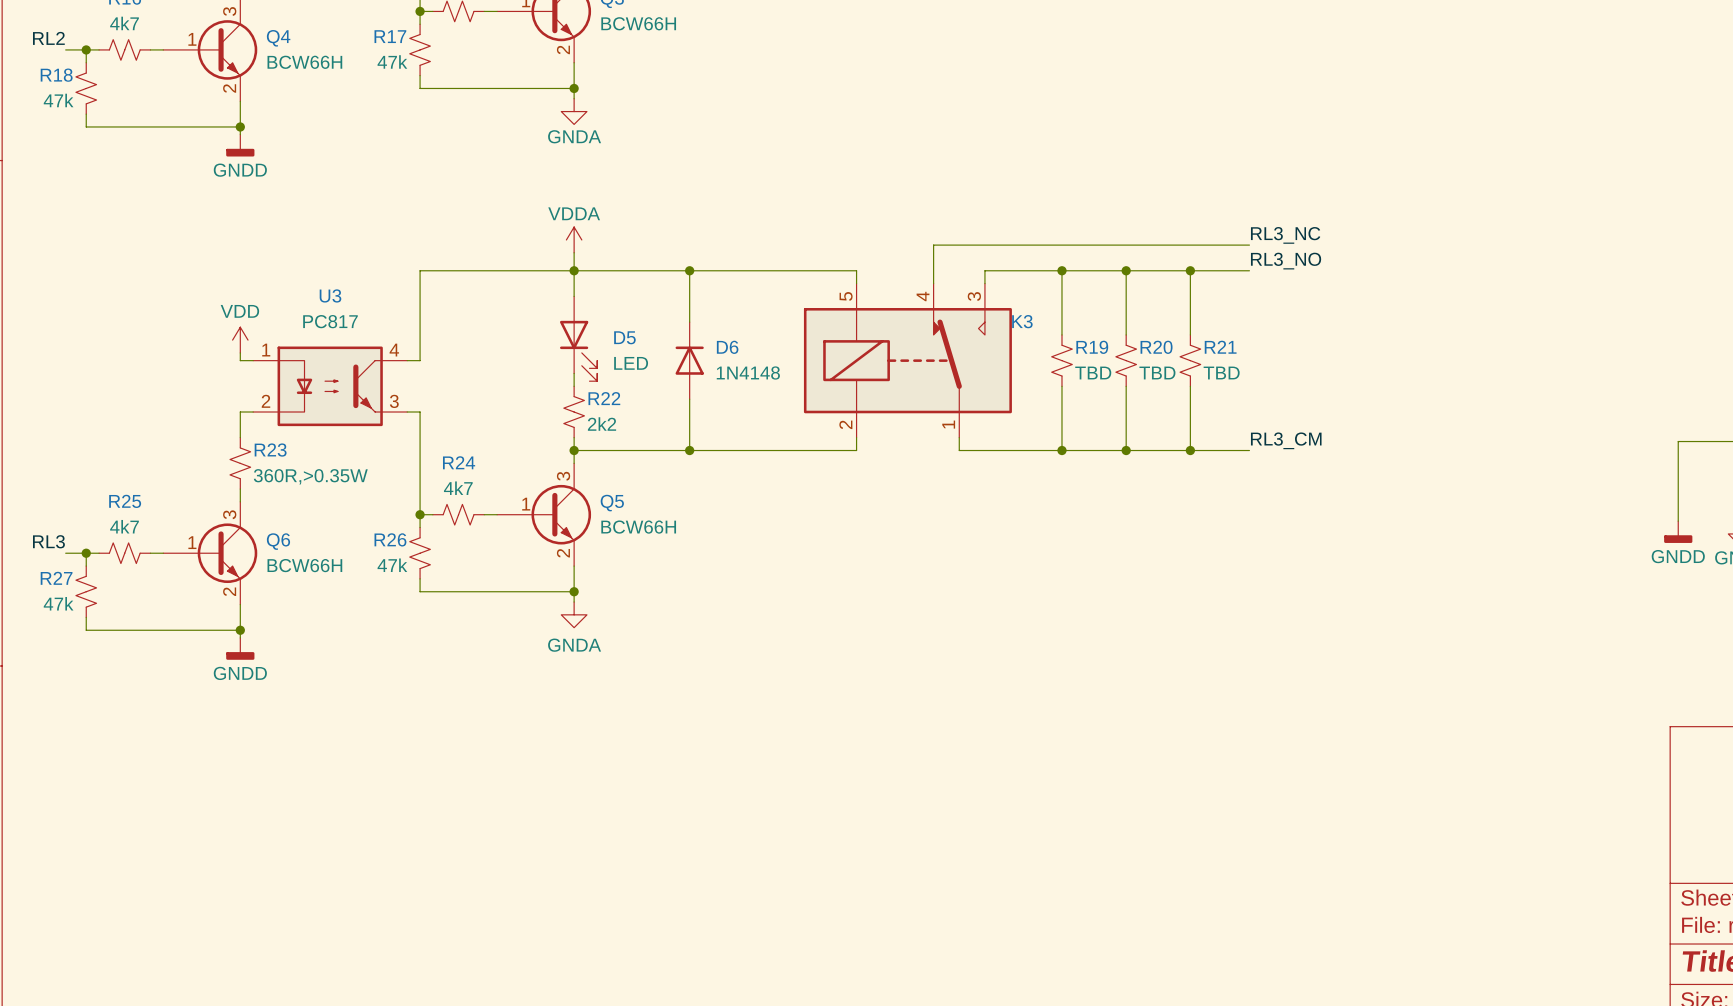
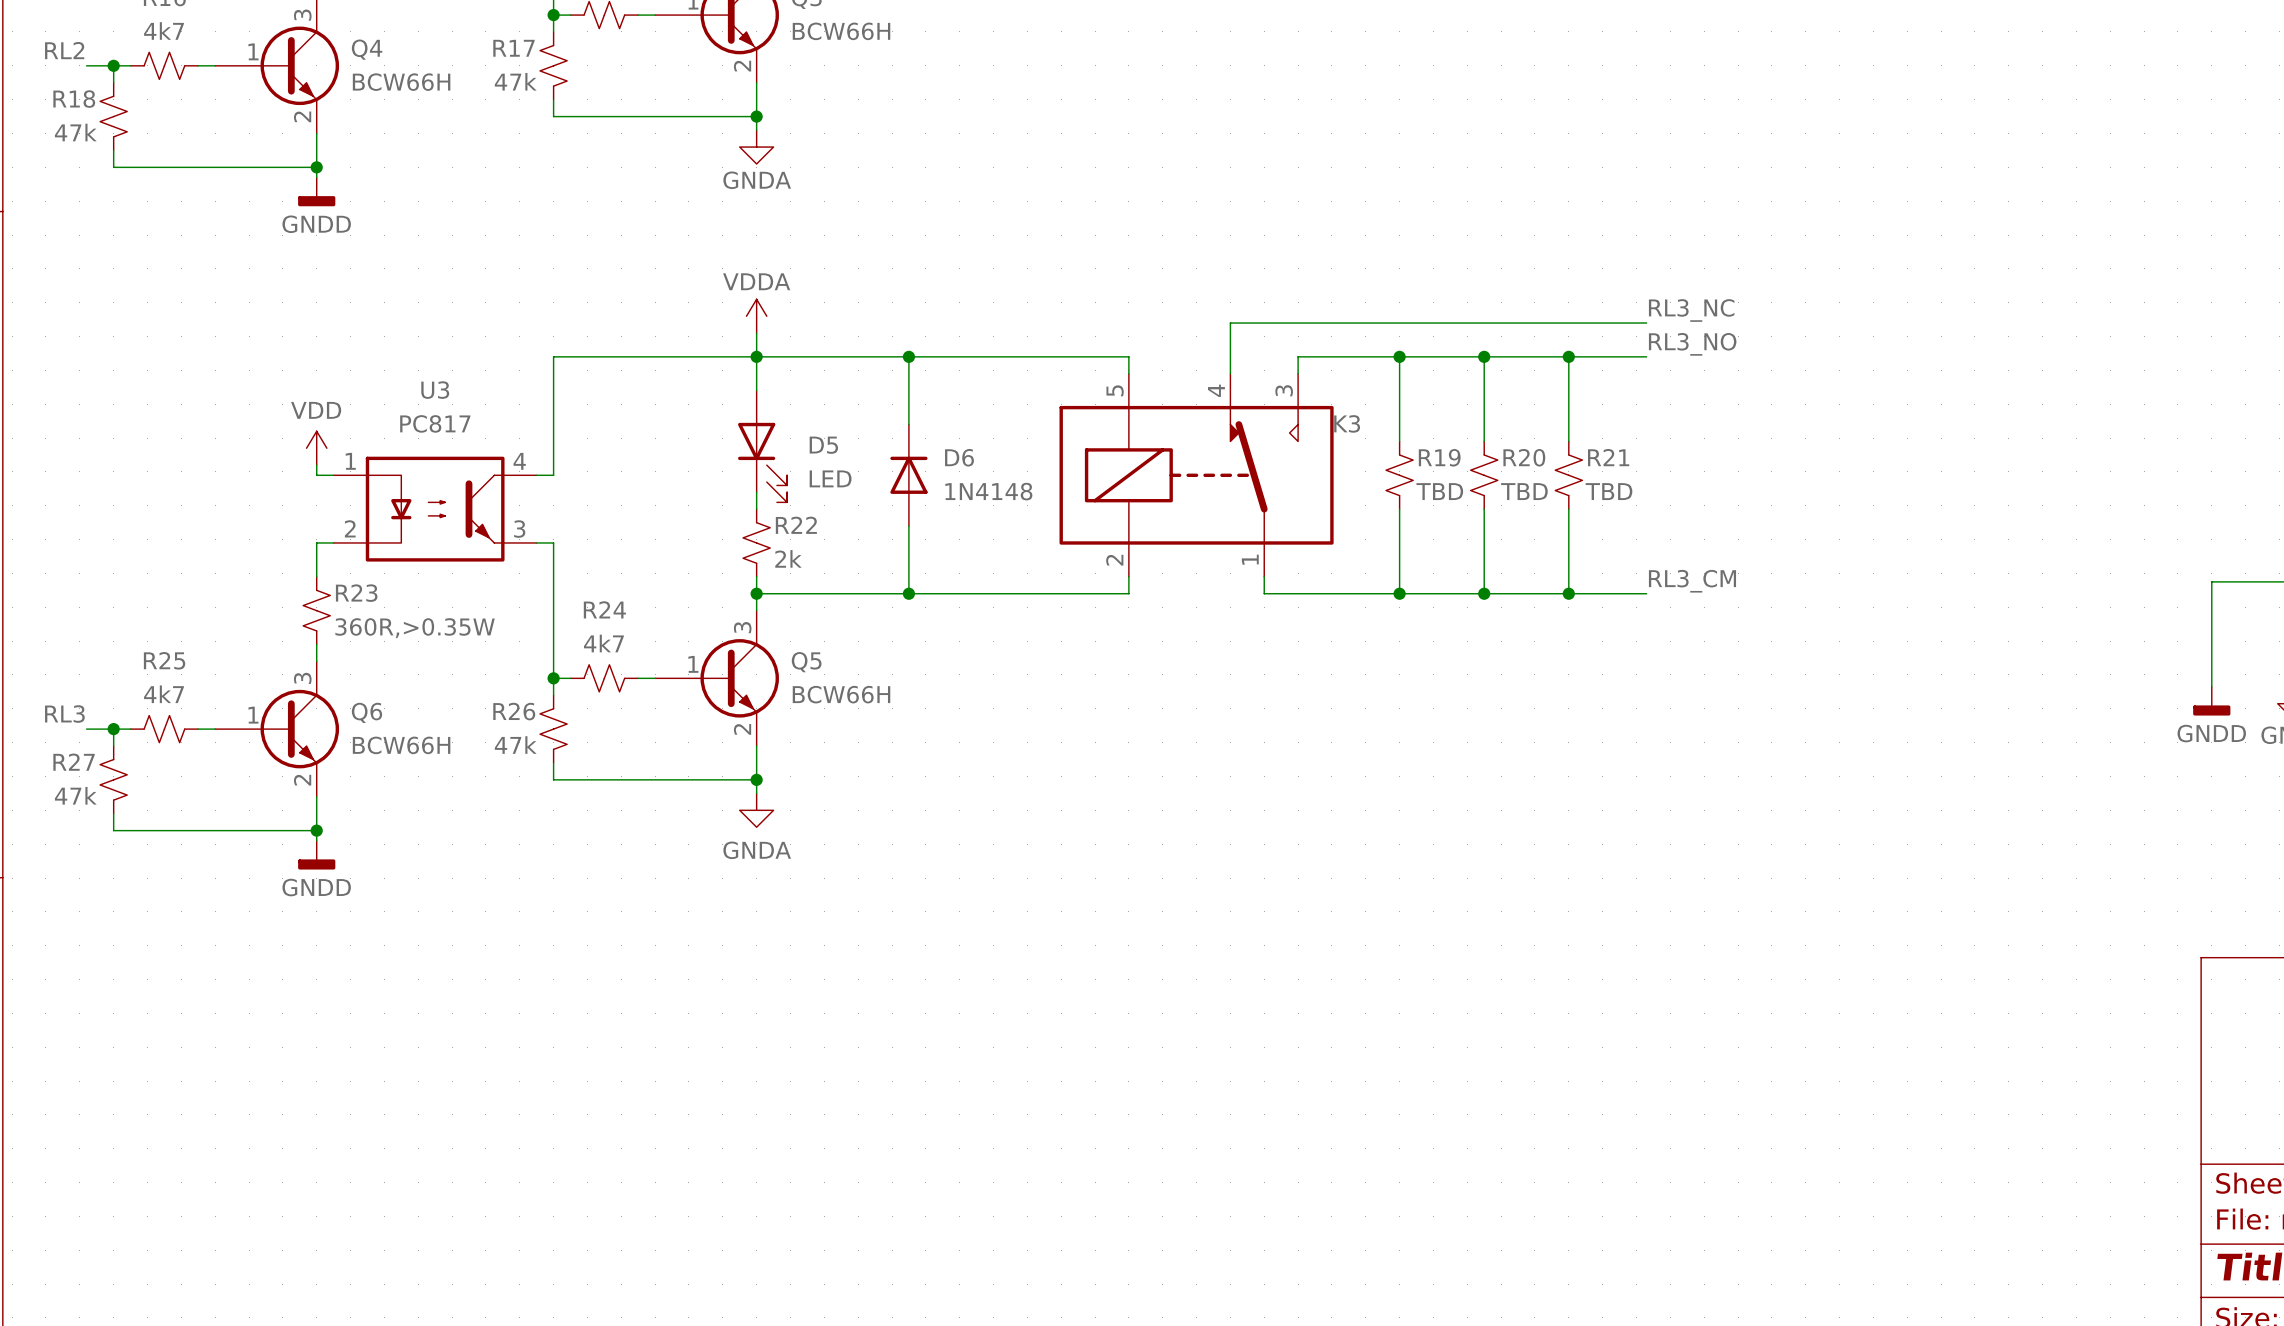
R22 value: 2k2 (602, 424) -> 2k (788, 558)

